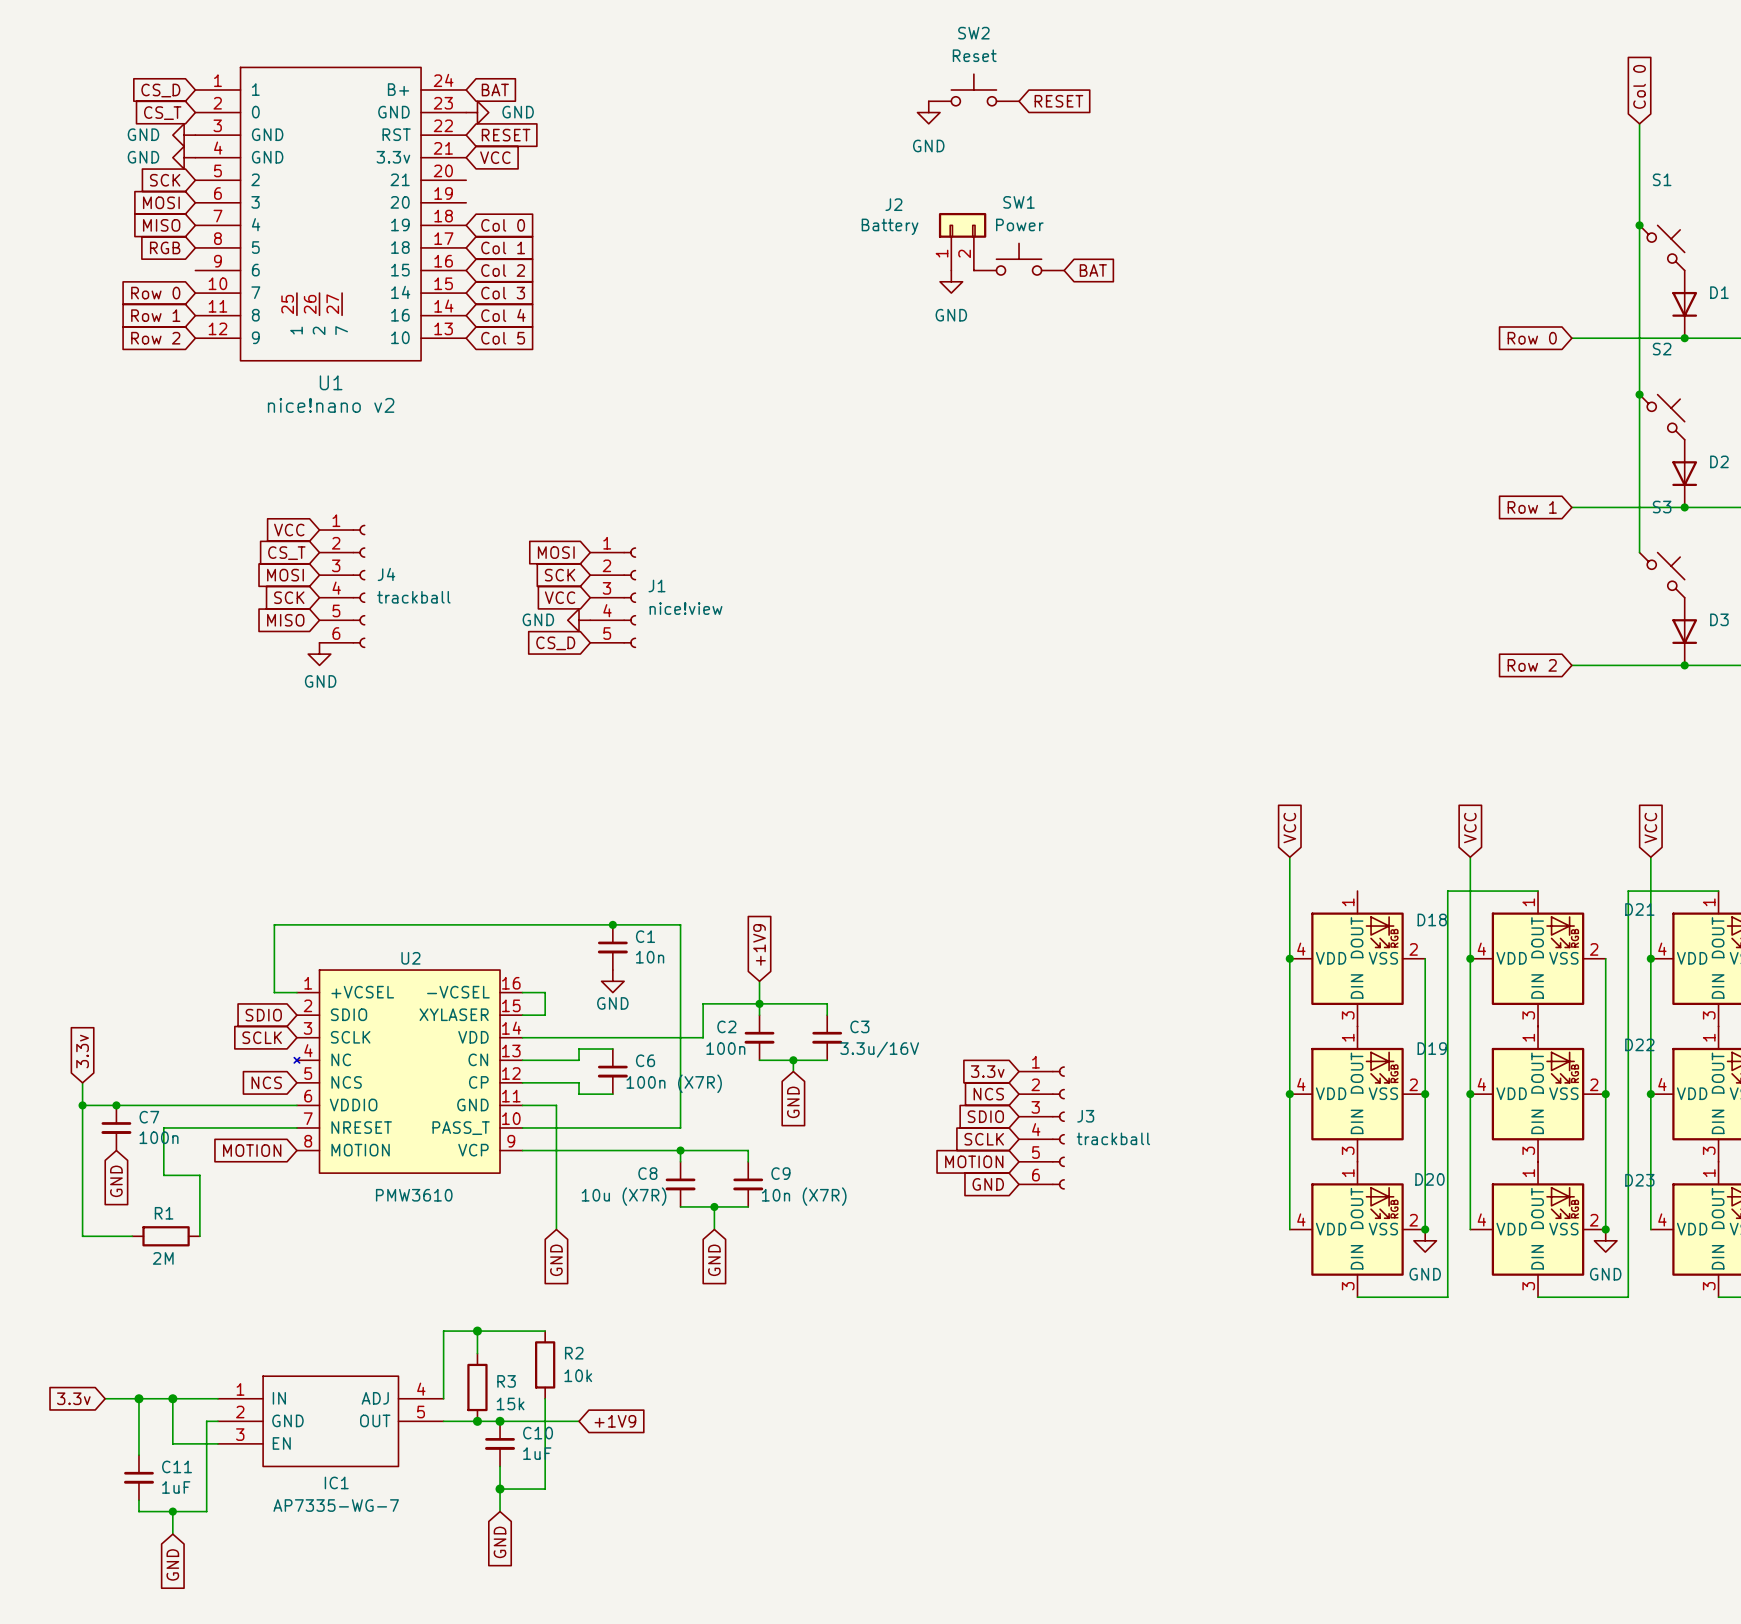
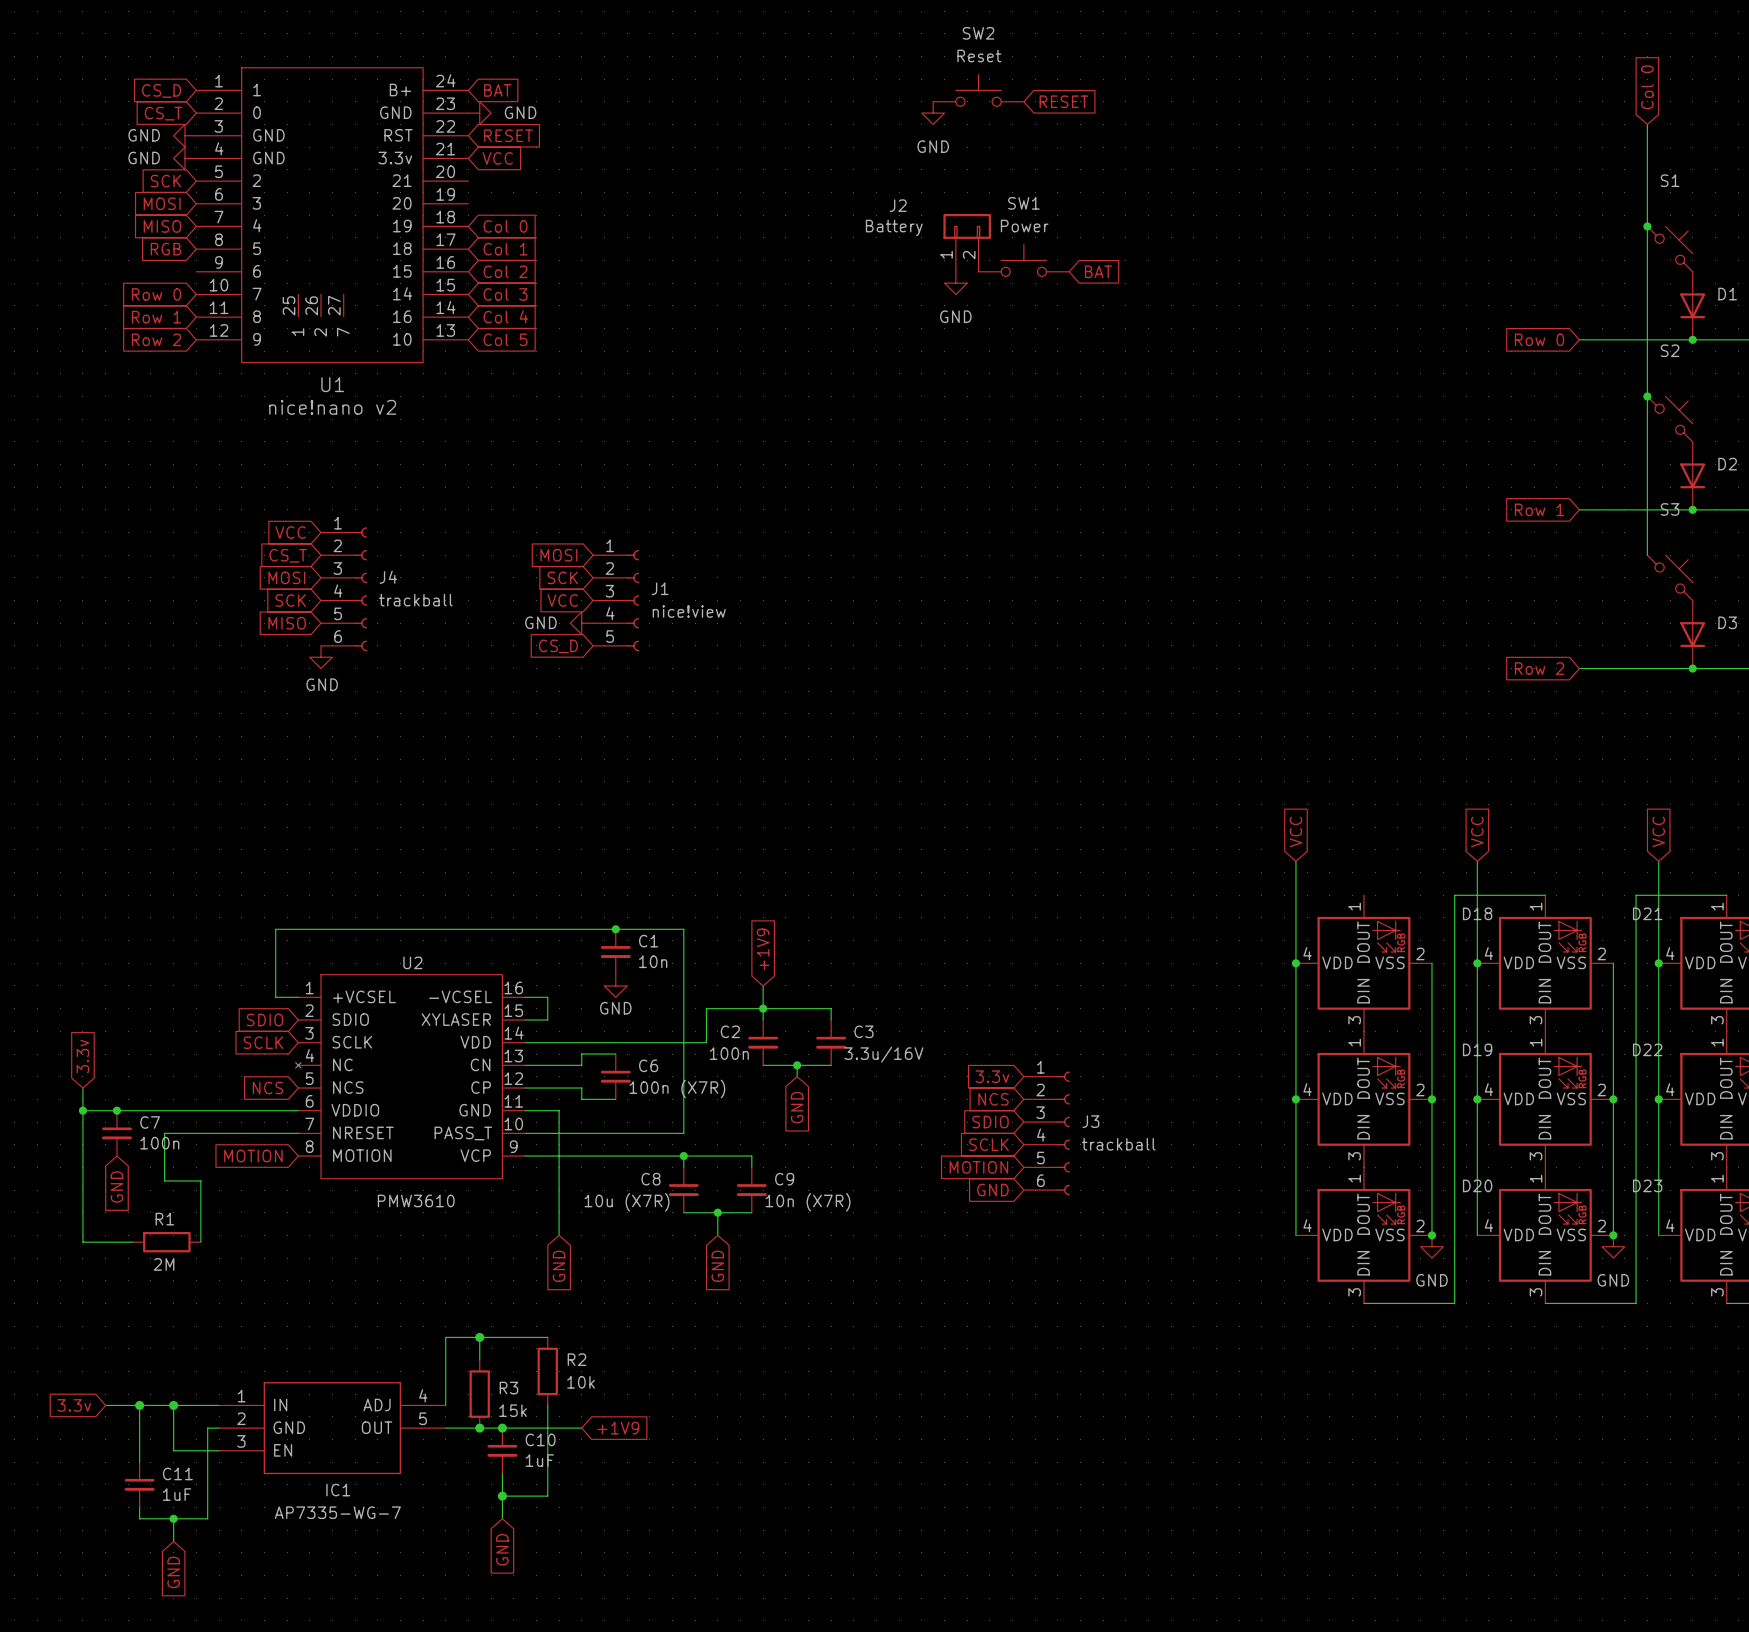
D18 name position: D18 (1432, 919) -> D18 (1477, 913)
D19 name position: D19 (1432, 1048) -> D19 (1477, 1049)
D20 name position: D20 (1429, 1179) -> D20 (1477, 1185)

